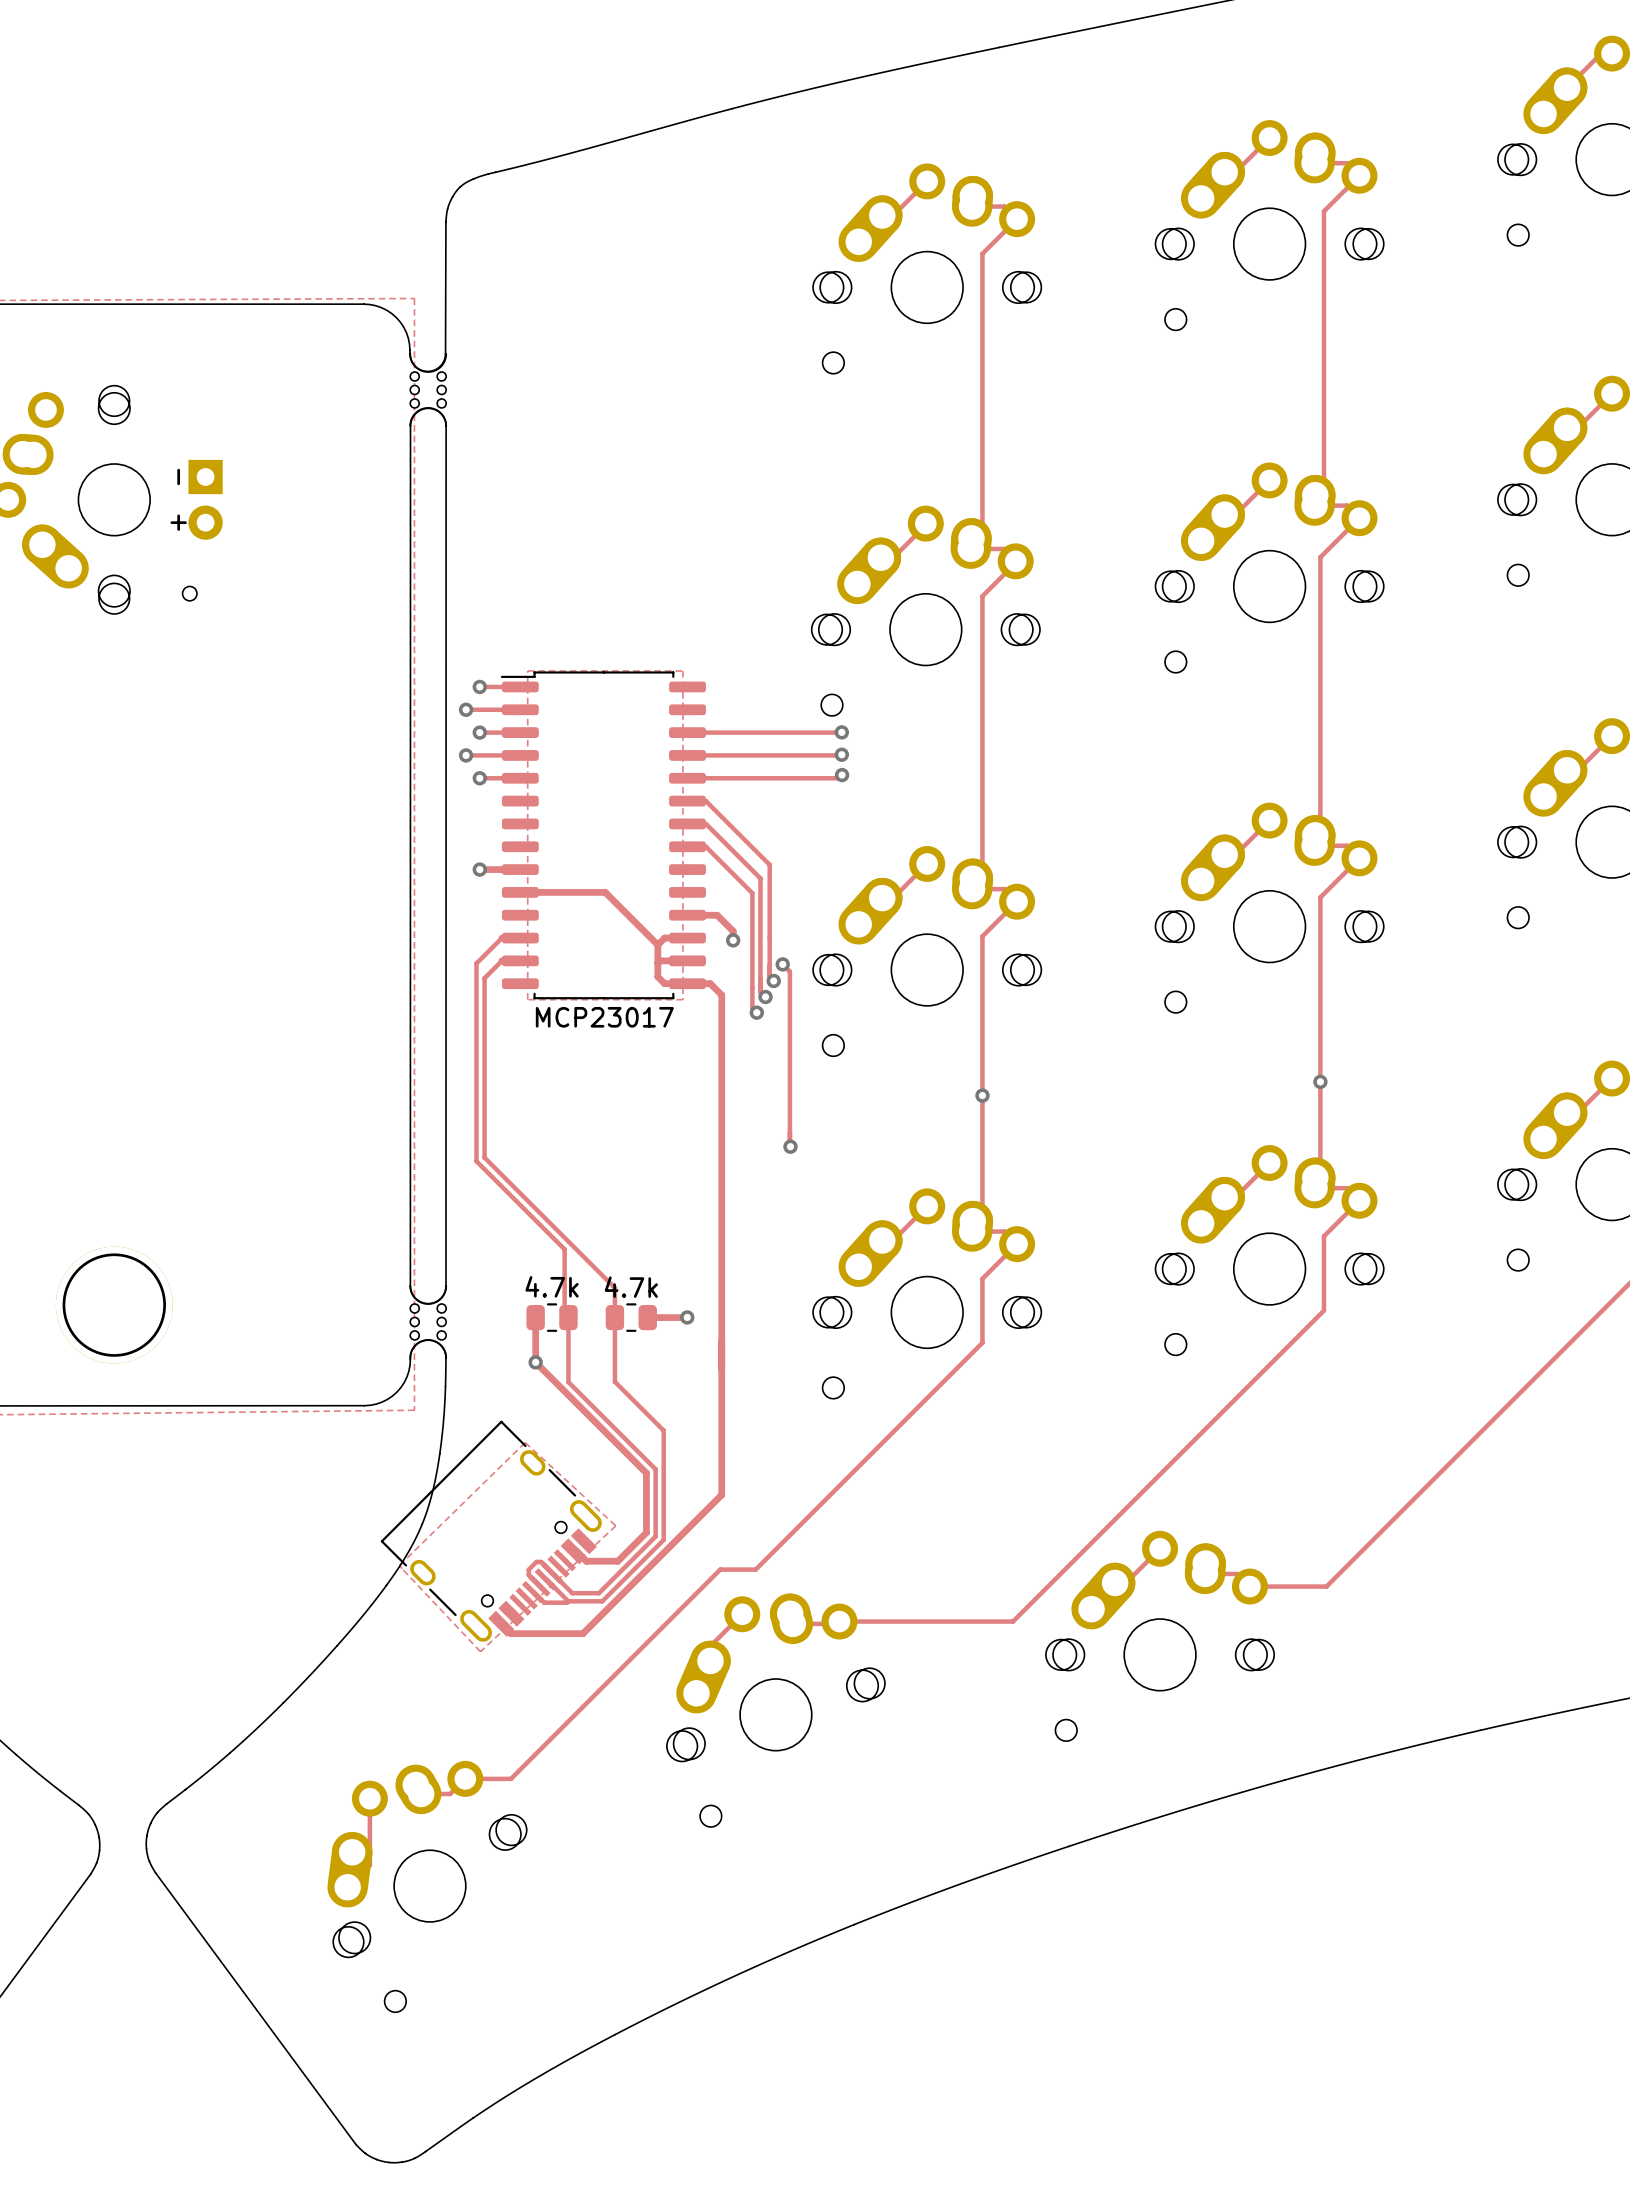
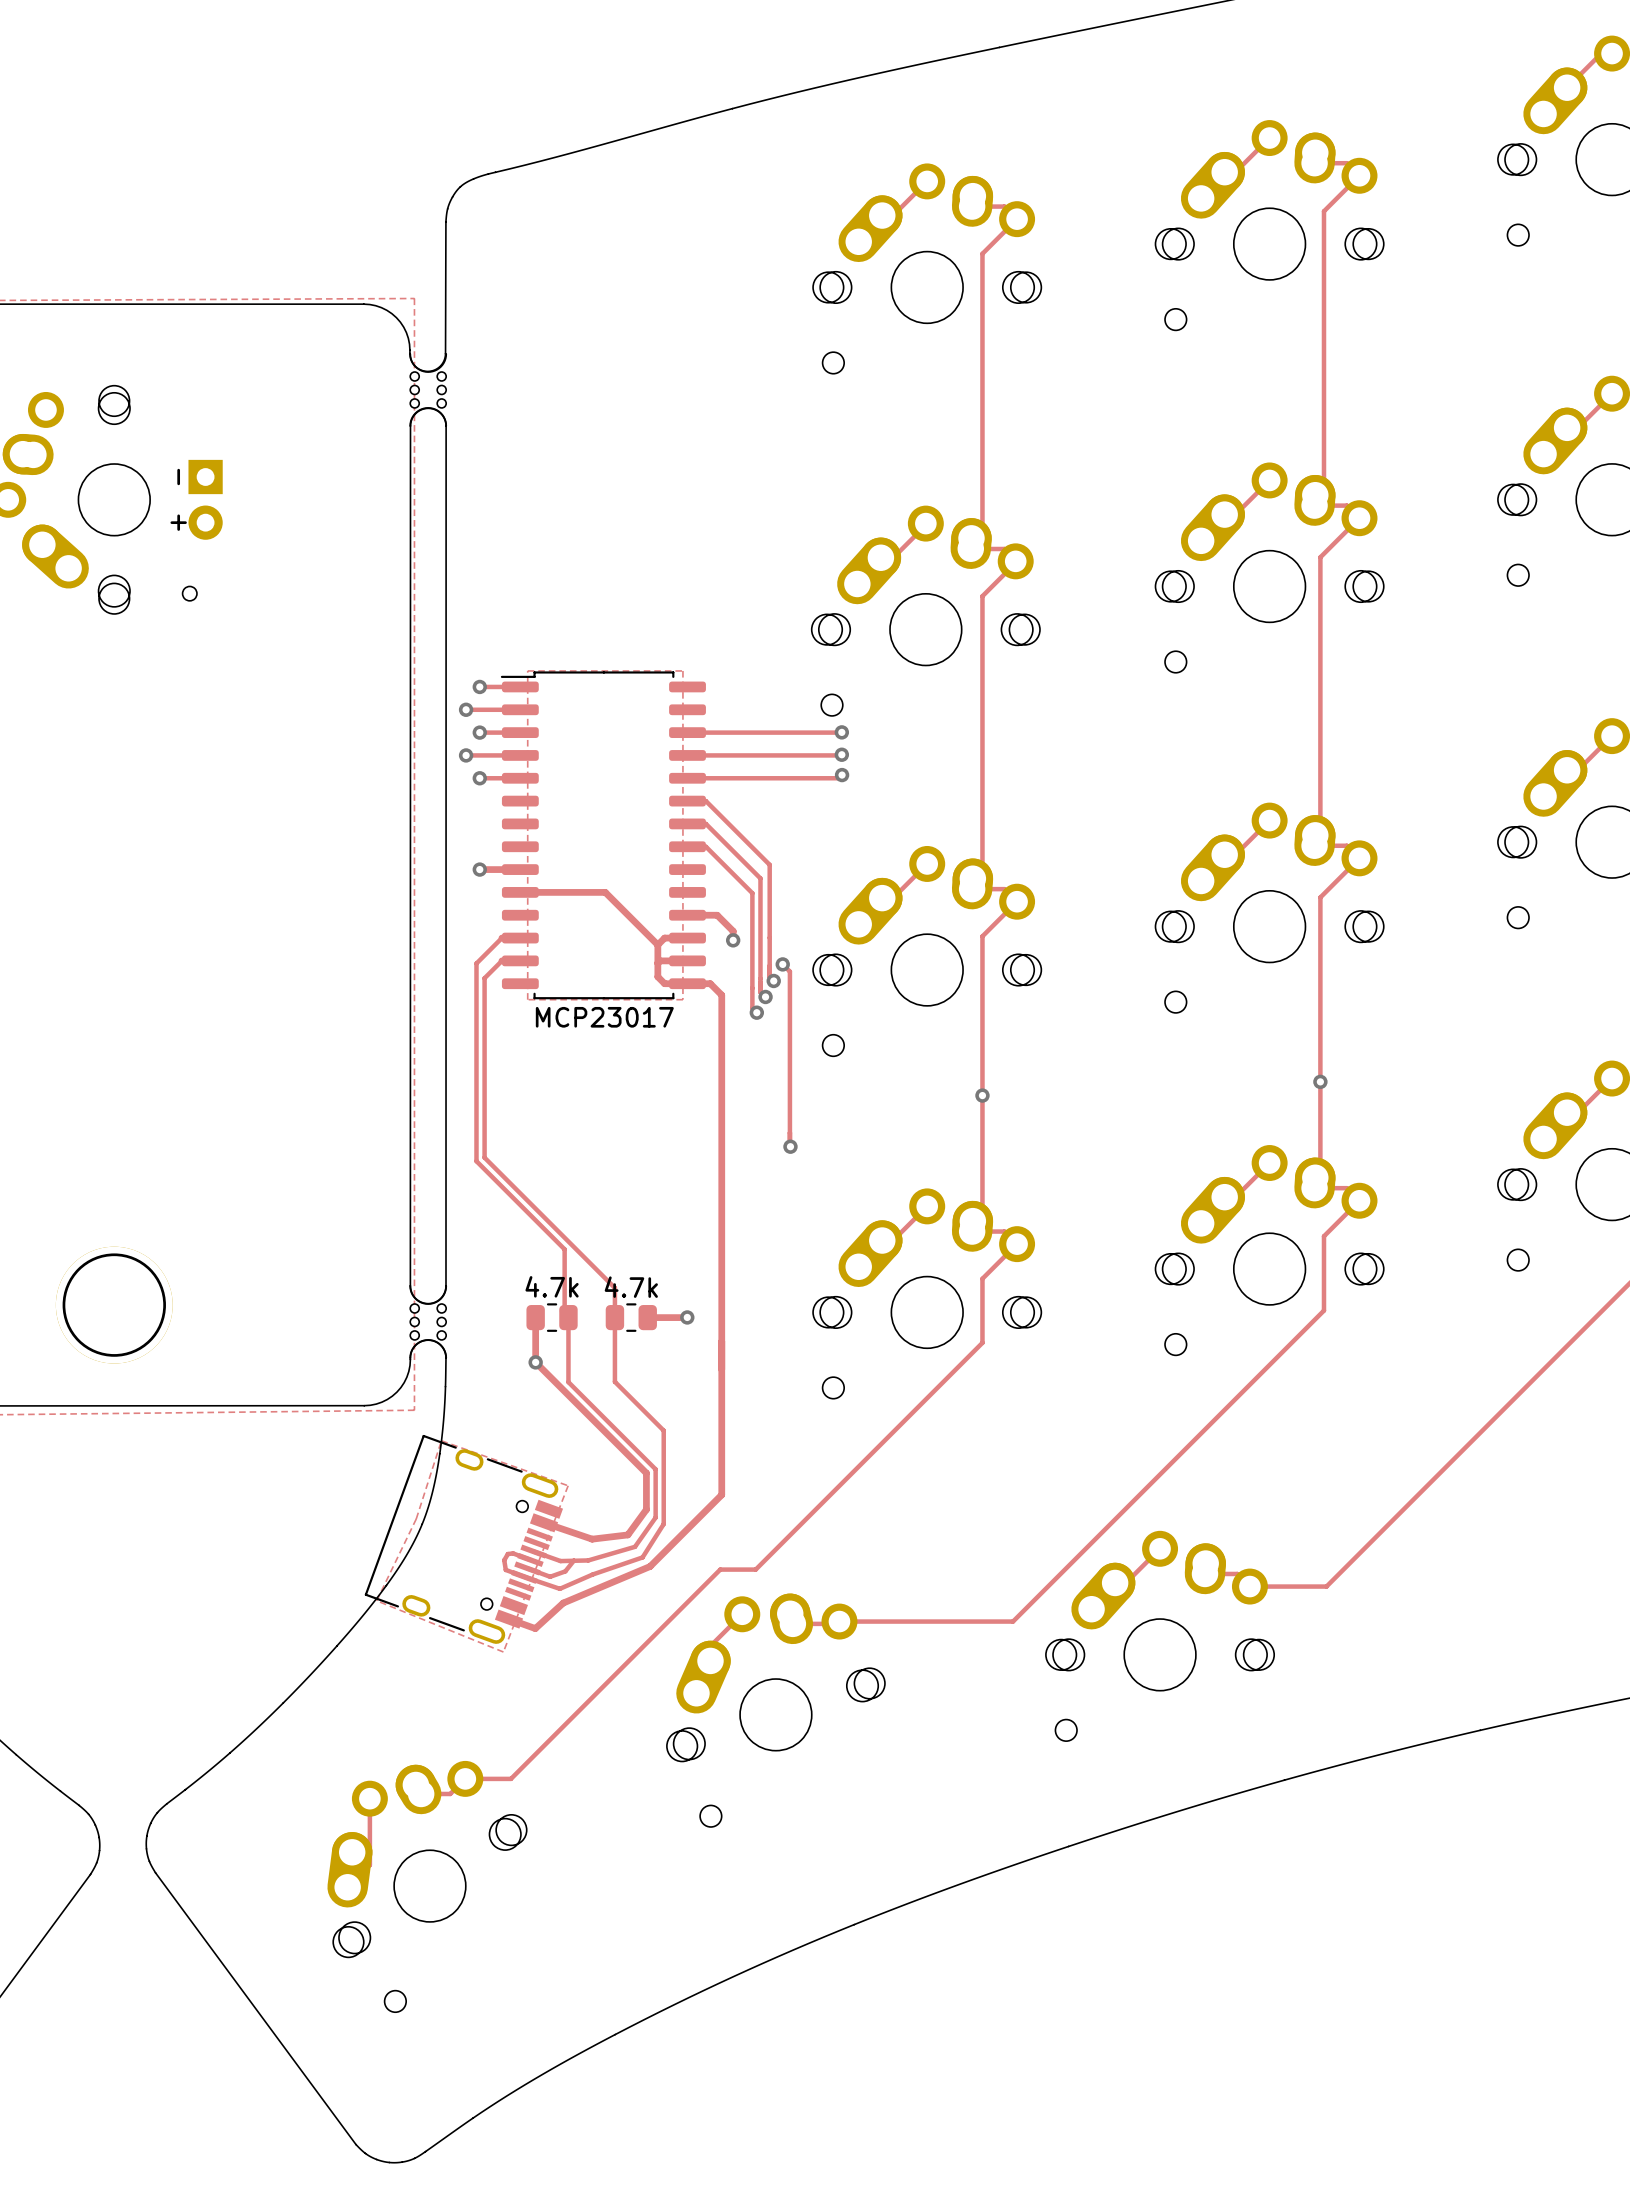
zone outline: (525, 1442) (399, 1565) (480, 1651) (615, 1525) (525, 1442) -> (441, 1440) (416, 1519) (376, 1600) (503, 1652) (568, 1485) (441, 1440)
track: (646, 1509) (646, 1532) (617, 1561) (586, 1561) (576, 1551) (573, 1551) -> (646, 1509) (627, 1534) (592, 1539) (544, 1522)
track: (655, 1517) (655, 1536) (598, 1593) (572, 1593) (541, 1561) (536, 1561) (528, 1569) (528, 1575) (539, 1585) -> (655, 1517) (635, 1546) (588, 1560) (560, 1561) (533, 1551)
track: (663, 1524) (663, 1539) (602, 1601) (568, 1601) -> (663, 1524) (642, 1557) (592, 1574) (559, 1588) (505, 1569) (504, 1560) (507, 1554) (513, 1553) (530, 1559)
part: (491, 1531) -> none
part: none -> (463, 1539)
track: none -> (573, 1560) (565, 1571) (550, 1576) (527, 1568)
track: (650, 1566) (582, 1633) (511, 1633) (501, 1623) -> (650, 1566) (563, 1603) (535, 1628) (508, 1619)
track: (545, 1579) (568, 1601) -> none
track: (533, 1592) (544, 1602) (568, 1601) -> none

